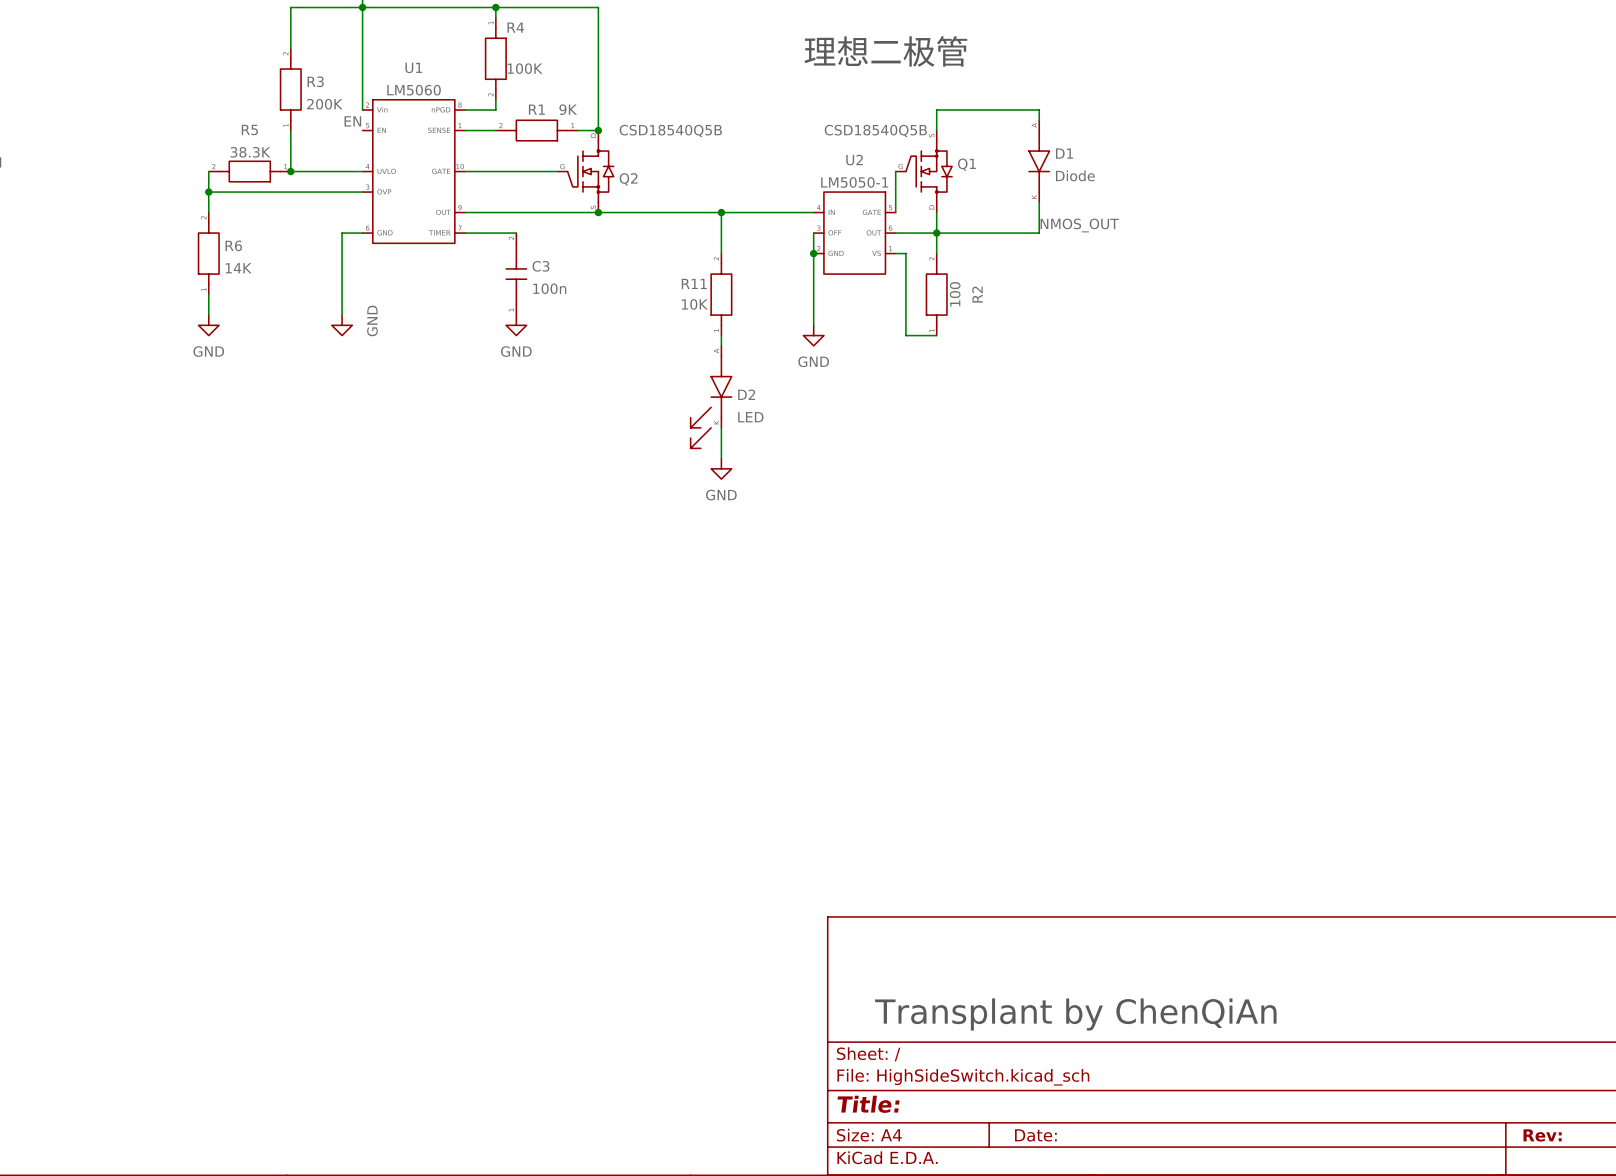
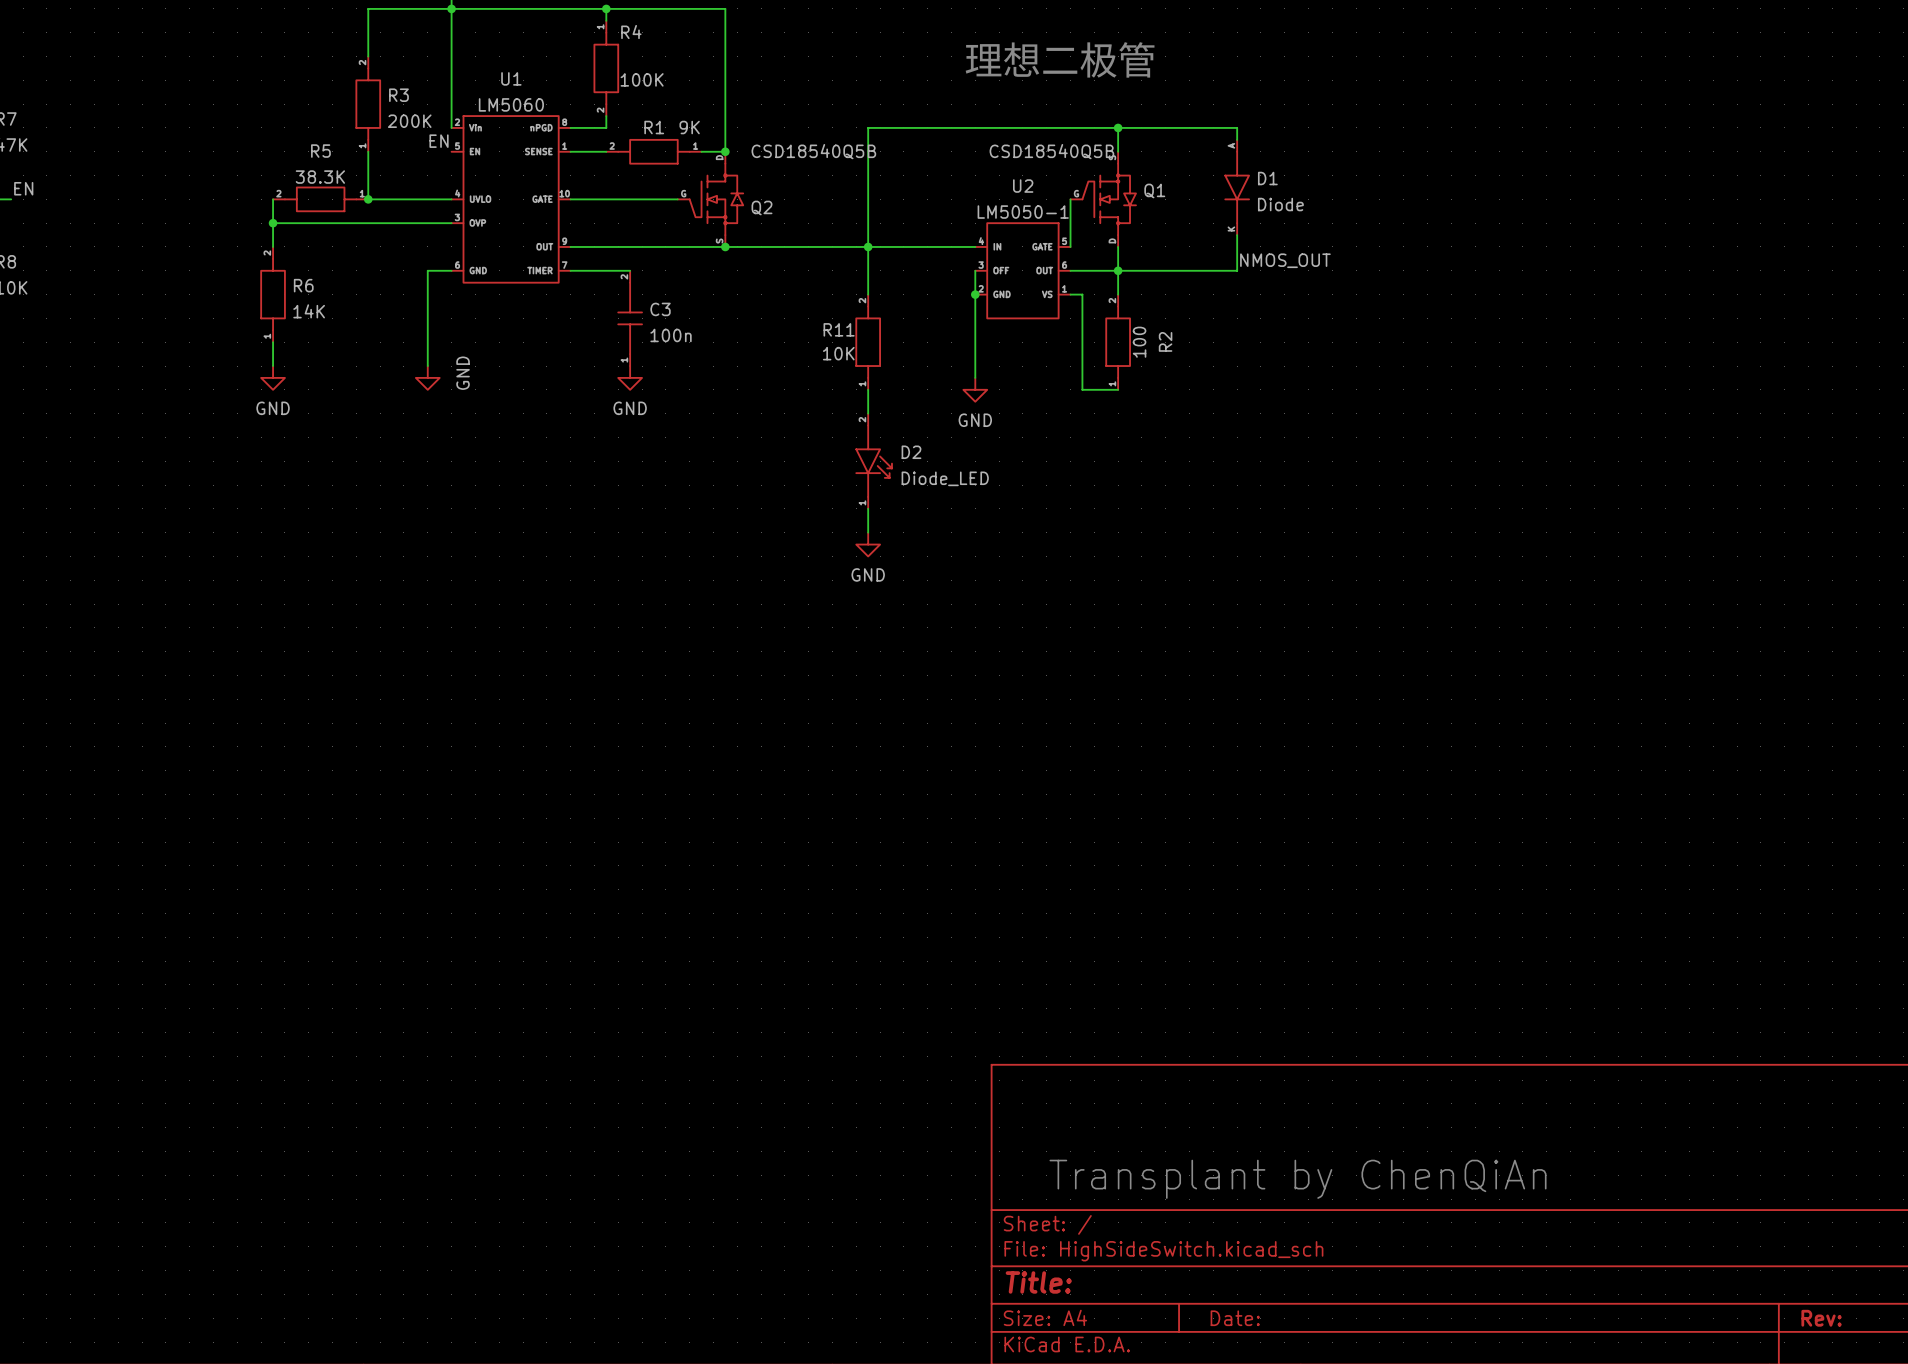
wire: none -> (1118, 127) (868, 127) (868, 246)
junction: none -> (1118, 127)
D2 symbol: [690, 345, 732, 449] -> [856, 413, 893, 509]
D2 value: LED (750, 417) -> Diode_LED (945, 478)

